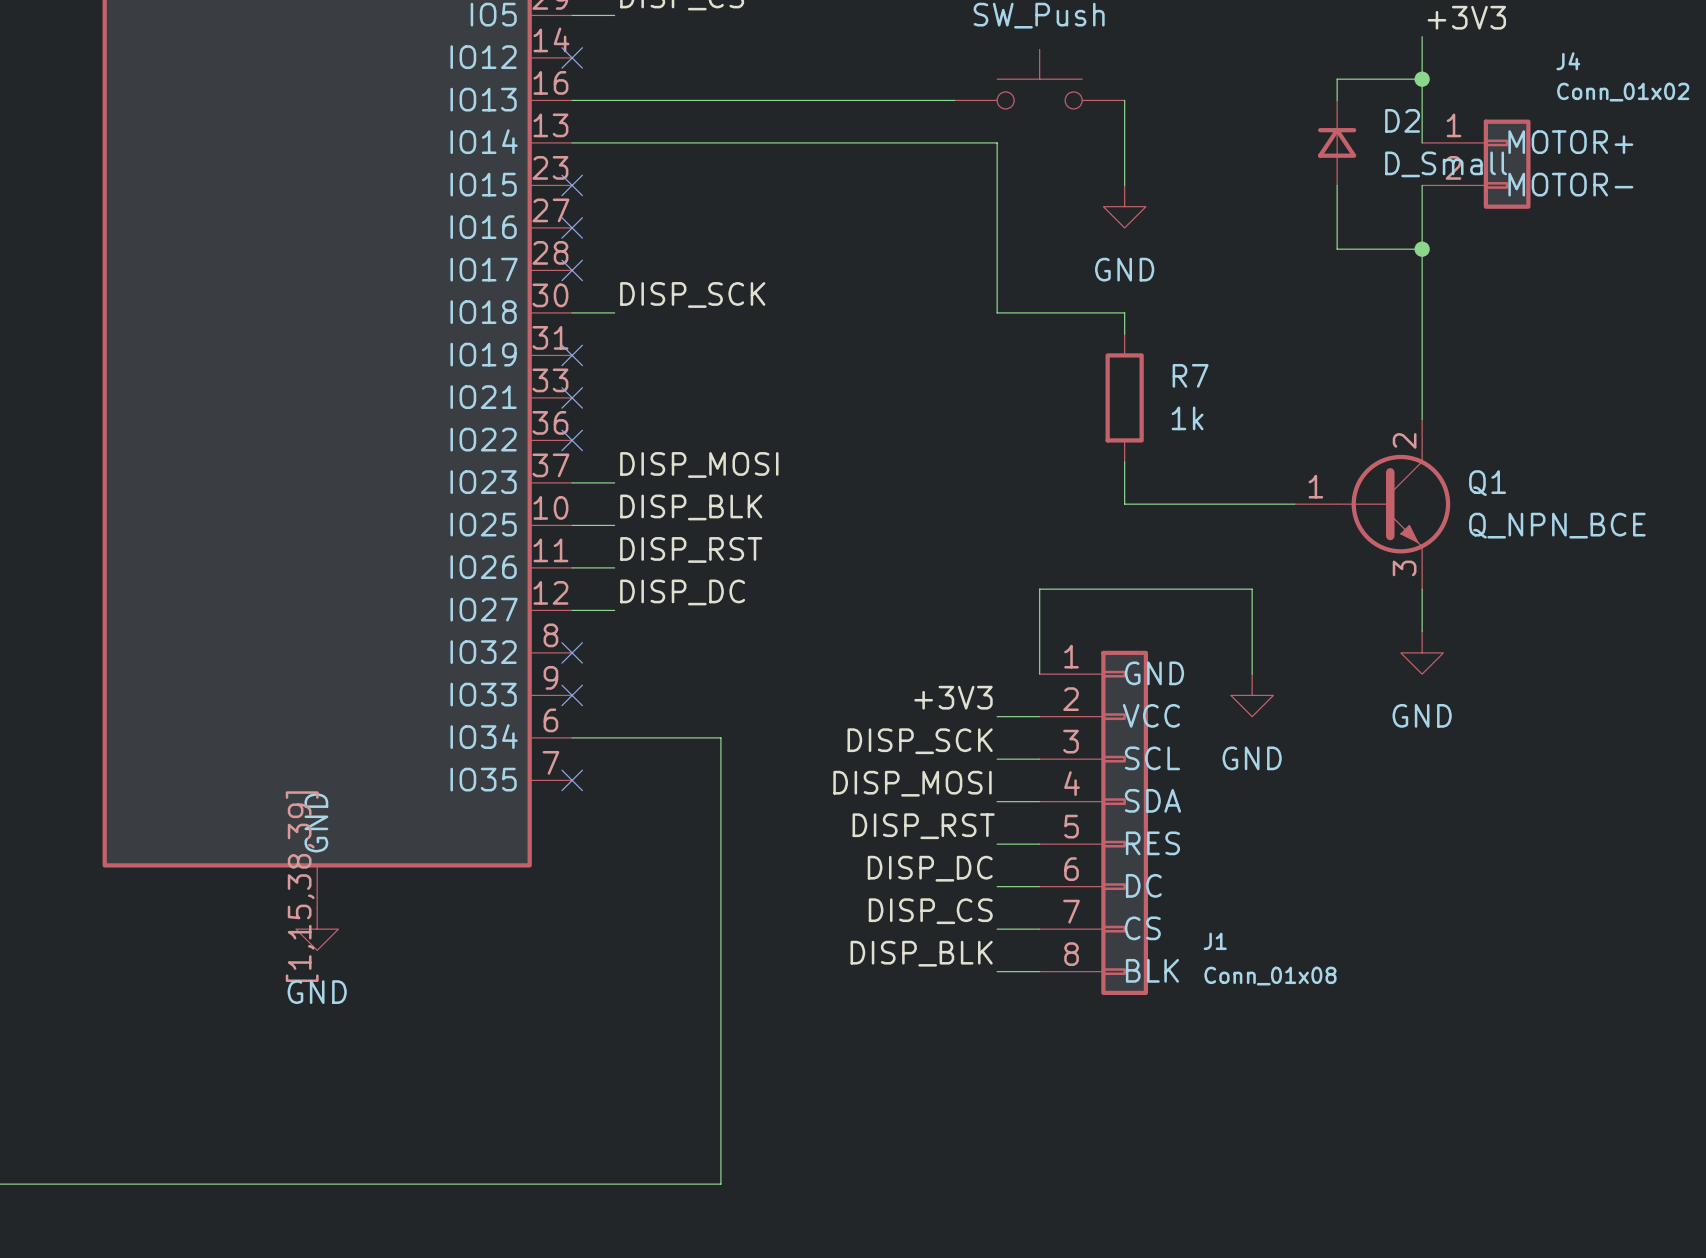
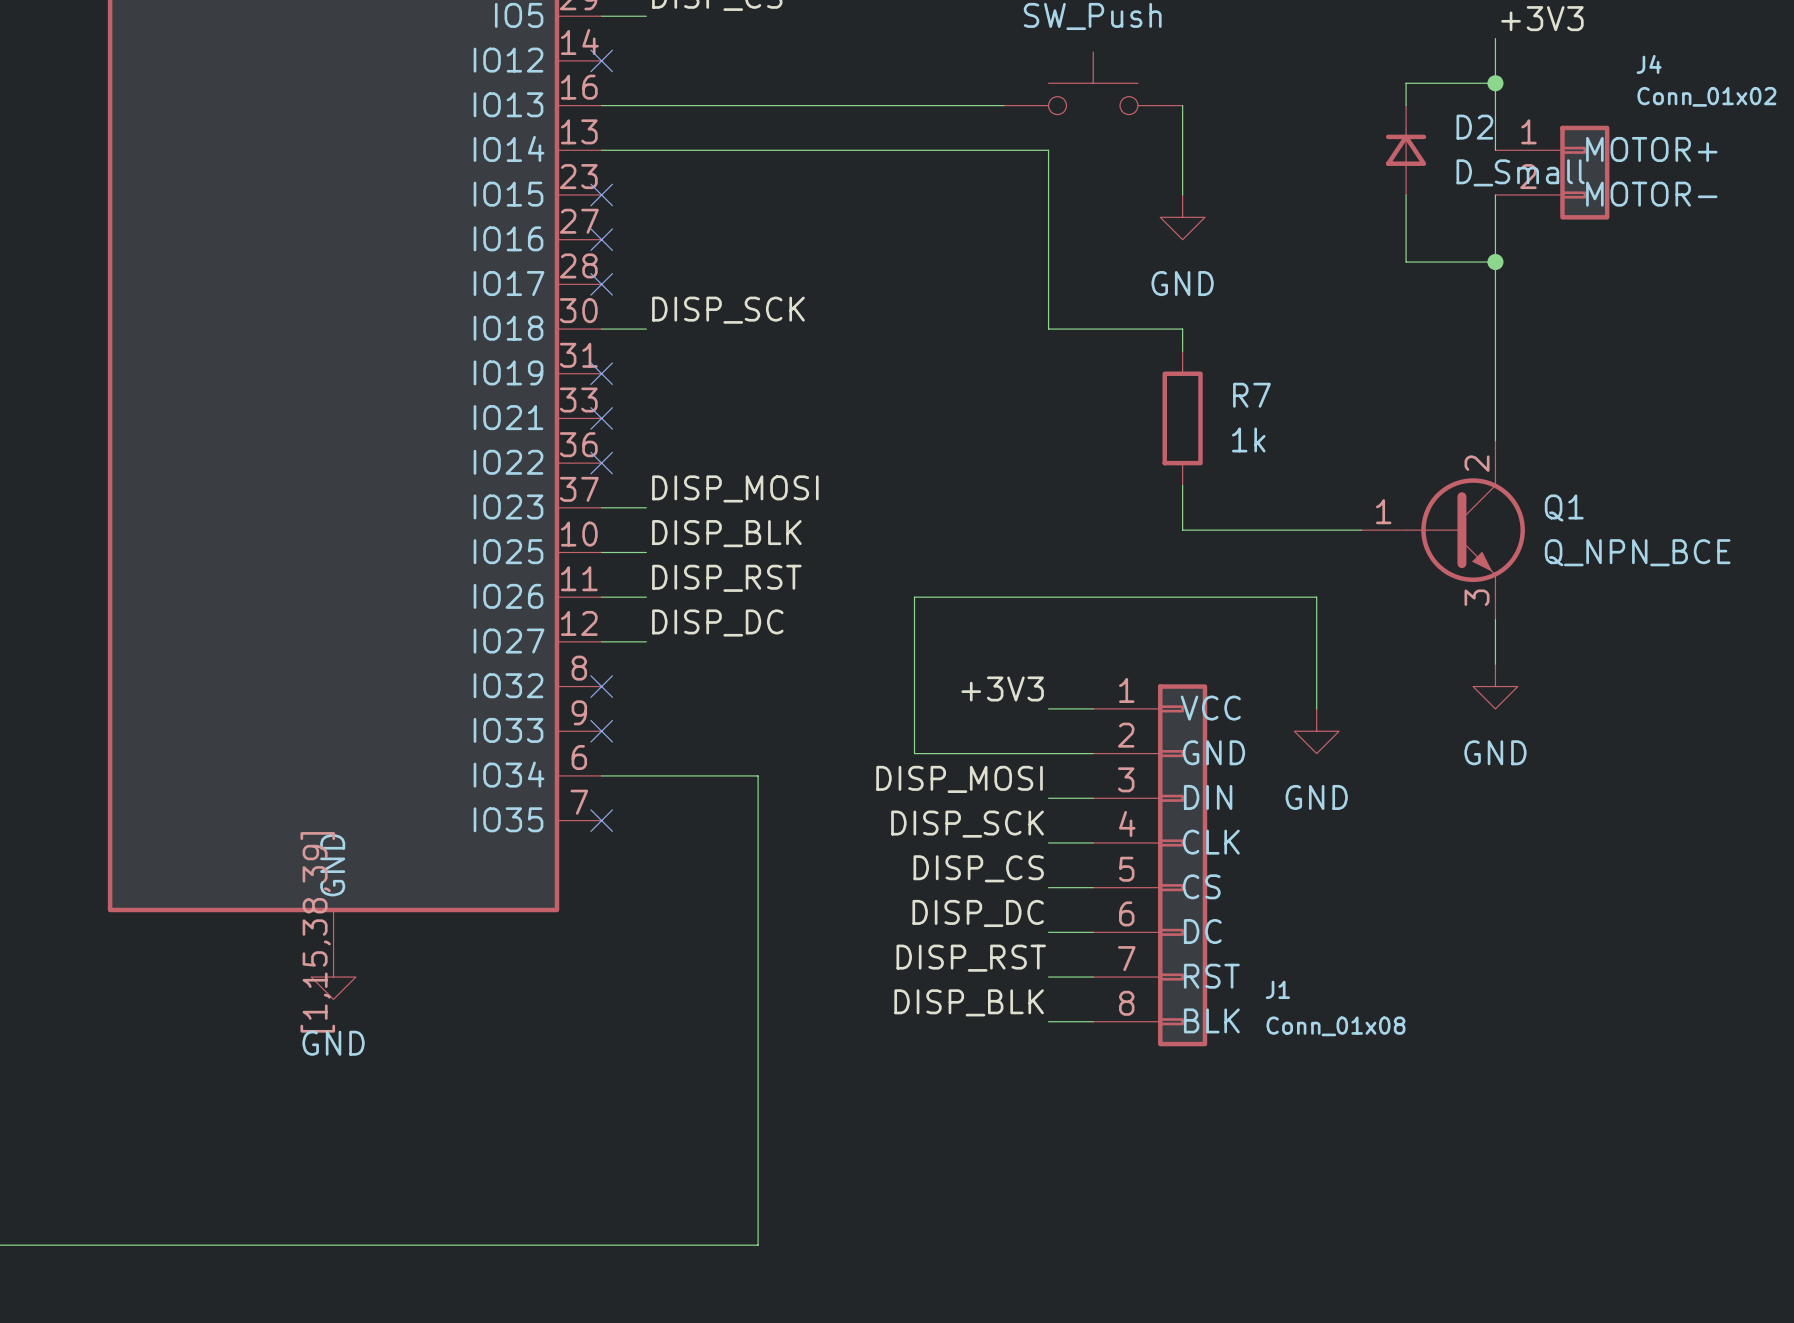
wire: (1252, 589) (1039, 589) (1039, 674) -> (1316, 619) (1316, 597) (914, 597) (914, 753) (1048, 753)
J1 pin name: GND (1154, 673) -> VCC (1210, 708)
wire: none -> (1048, 708) (1093, 708)
label position: +3V3 (953, 697) -> +3V3 (1002, 688)
J1 pin name: VCC (1151, 715) -> GND (1213, 752)
label: DISP_SCK (920, 741) -> DISP_MOSI (959, 779)
J1 pin name: SCL (1152, 758) -> DIN (1208, 797)
label: DISP_MOSI (912, 783) -> DISP_SCK (967, 824)
J1 pin name: SDA (1152, 800) -> CLK (1211, 842)
label: DISP_RST (923, 826) -> DISP_CS (978, 868)
J1 pin name: RES (1152, 843) -> CS (1201, 886)
label: DISP_CS (930, 911) -> DISP_RST (971, 958)
J1 pin name: CS (1142, 928) -> RST (1211, 976)

